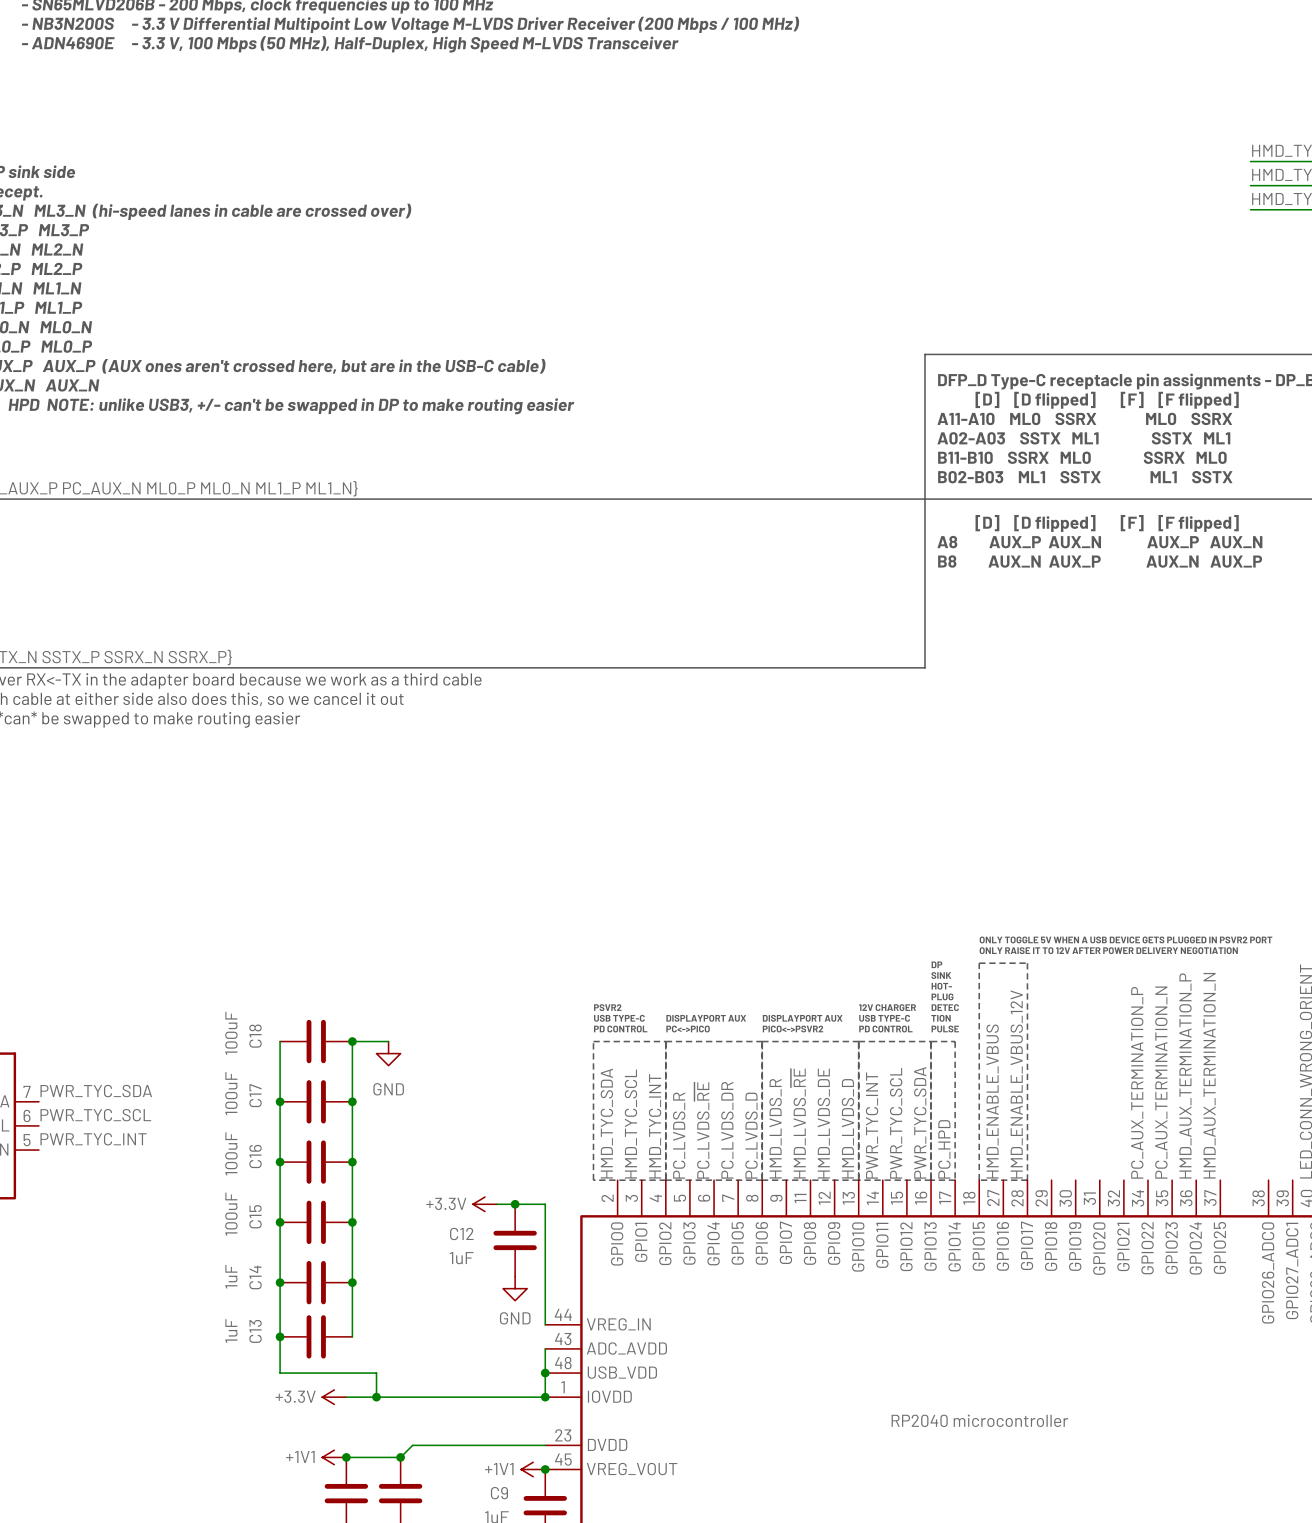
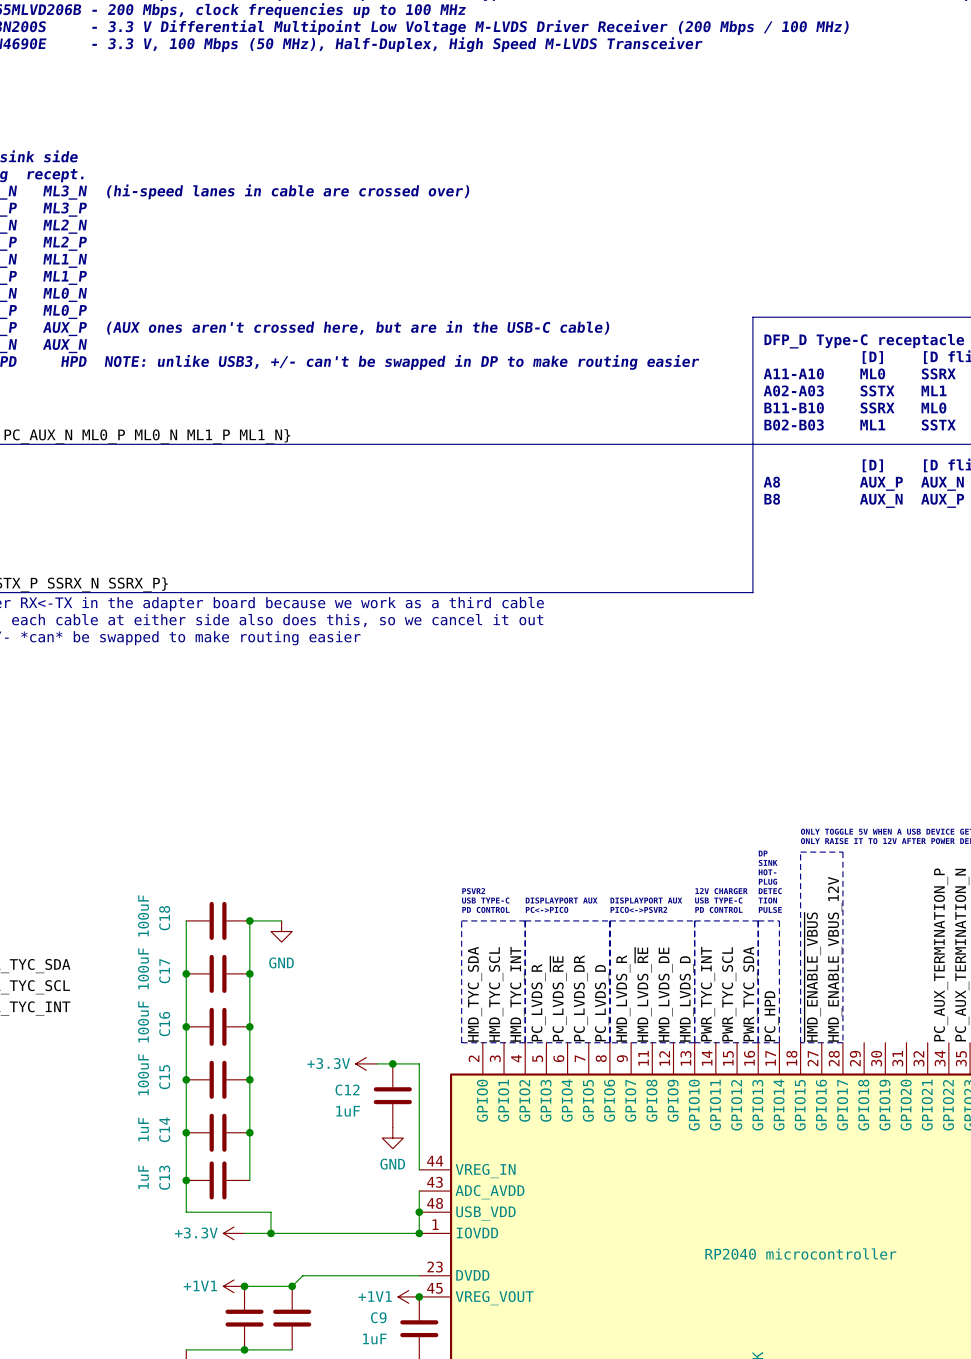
label: HMD_ENABLE_VBUS (992, 1101) -> ~{HMD_ENABLE_VBUS} (812, 977)

